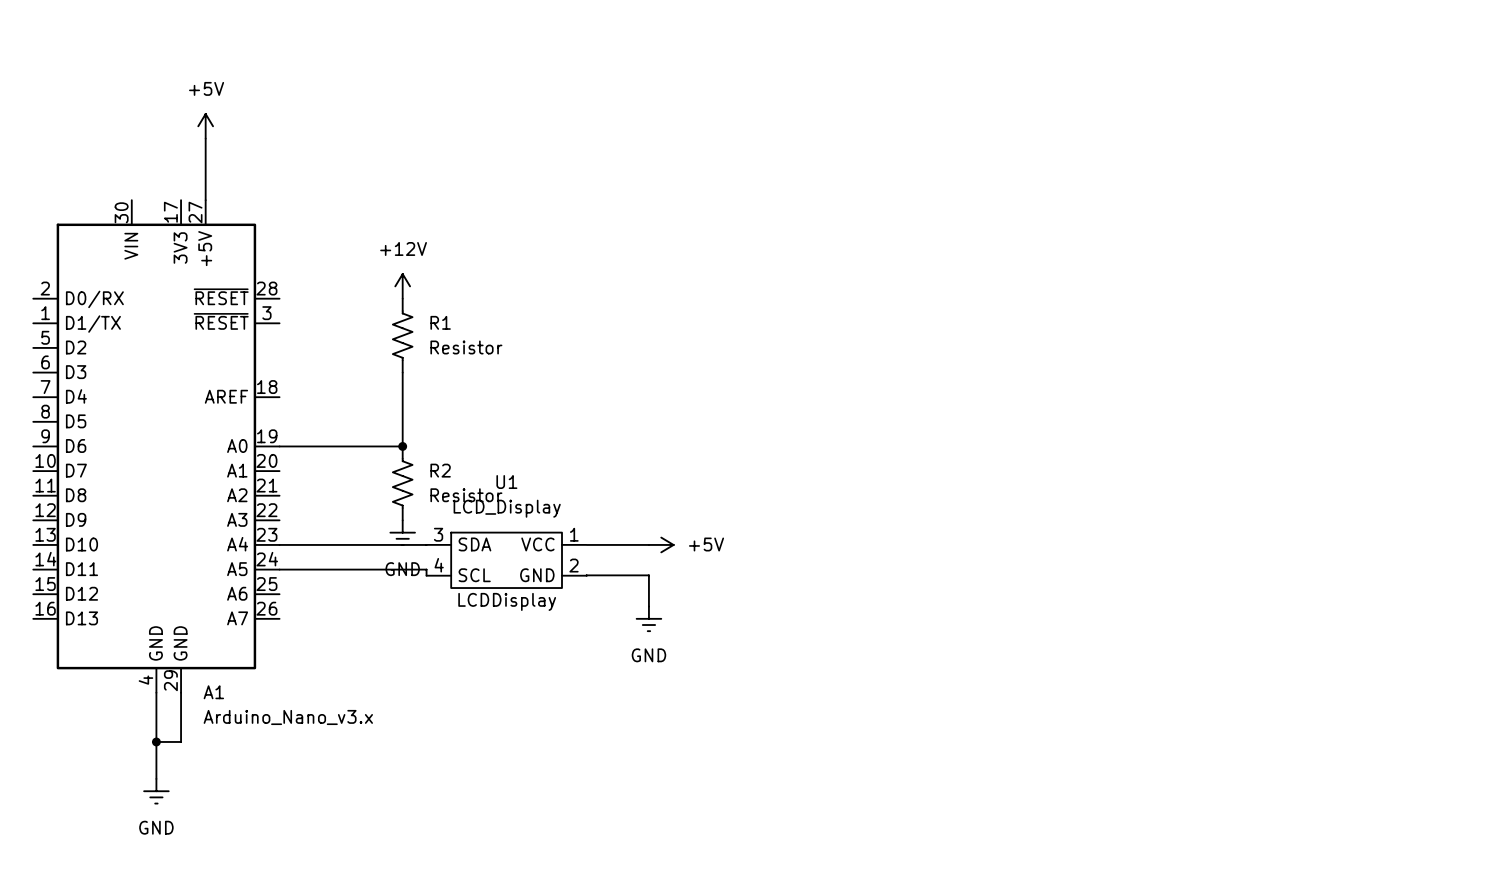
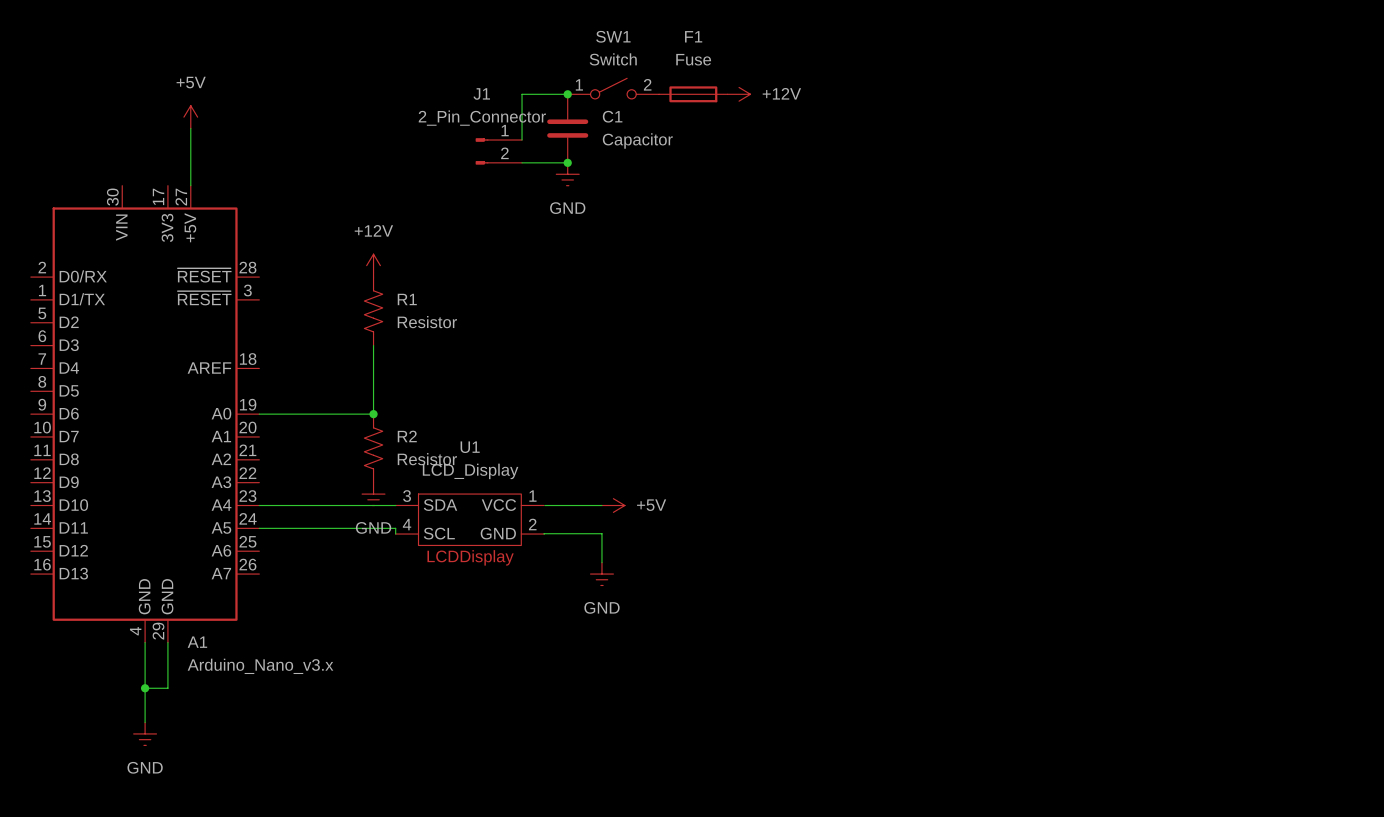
SW1: none -> Switch (613, 88)
wire: none -> (567, 94) (522, 94) (522, 140)
junction: none -> (567, 94)
F1: none -> Fuse (693, 94)
power symbol: none -> +12V (739, 94)
C1: none -> Capacitor (567, 128)
J1: none -> 2_Pin_Connector (498, 151)
wire: none -> (522, 162) (567, 162)
junction: none -> (567, 162)
power symbol: none -> GND (567, 174)

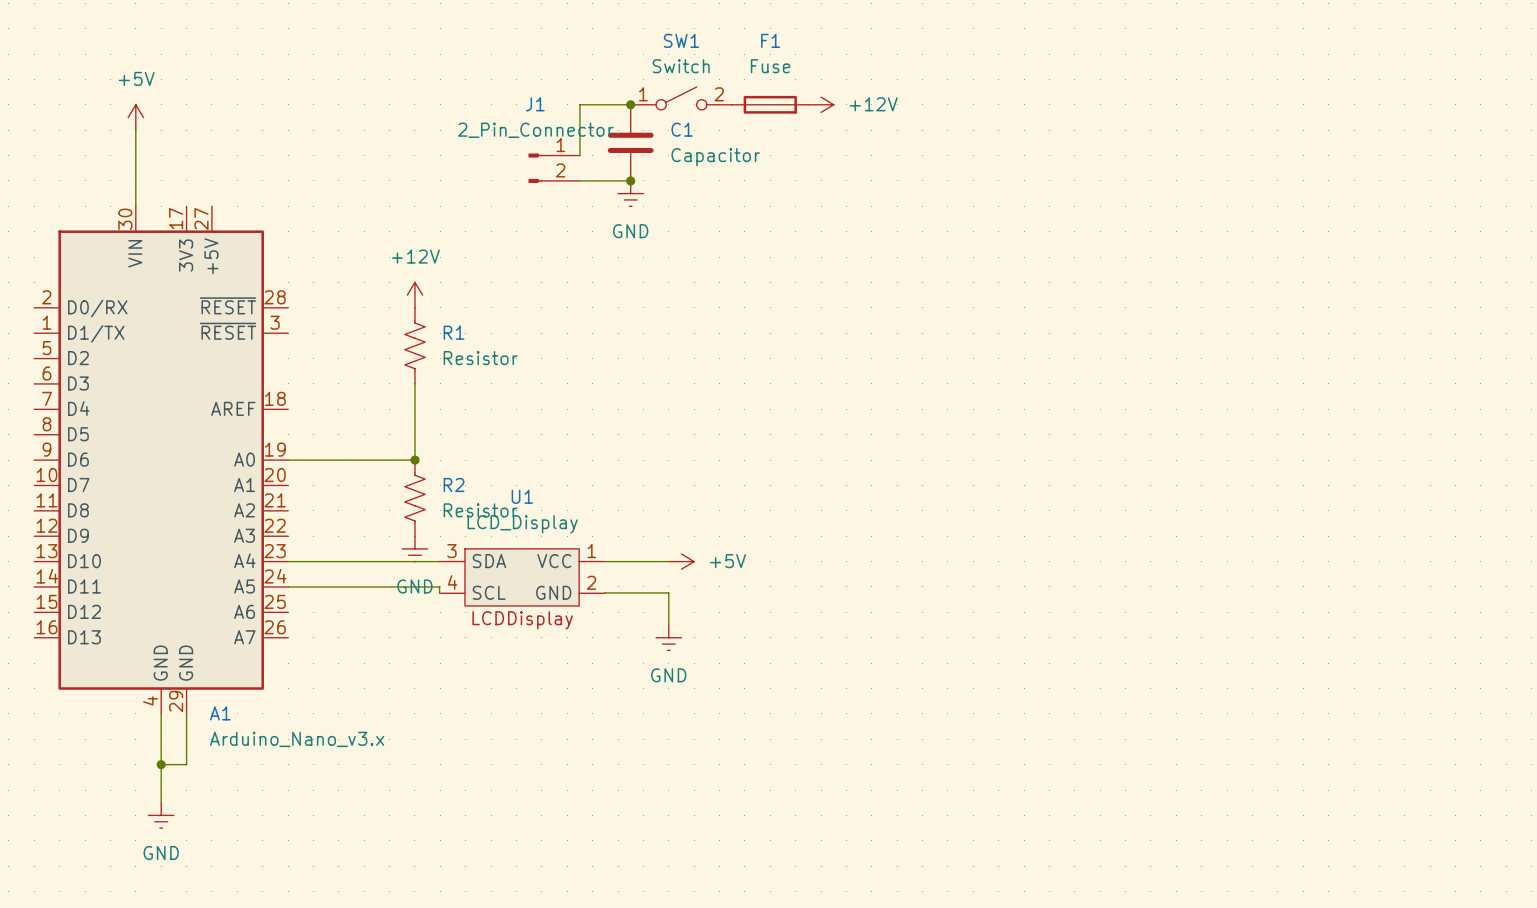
wire: none -> (135, 130) (135, 206)
power symbol position: +5V (190, 117) -> +5V (135, 117)
wire: (190, 128) (190, 185) -> none

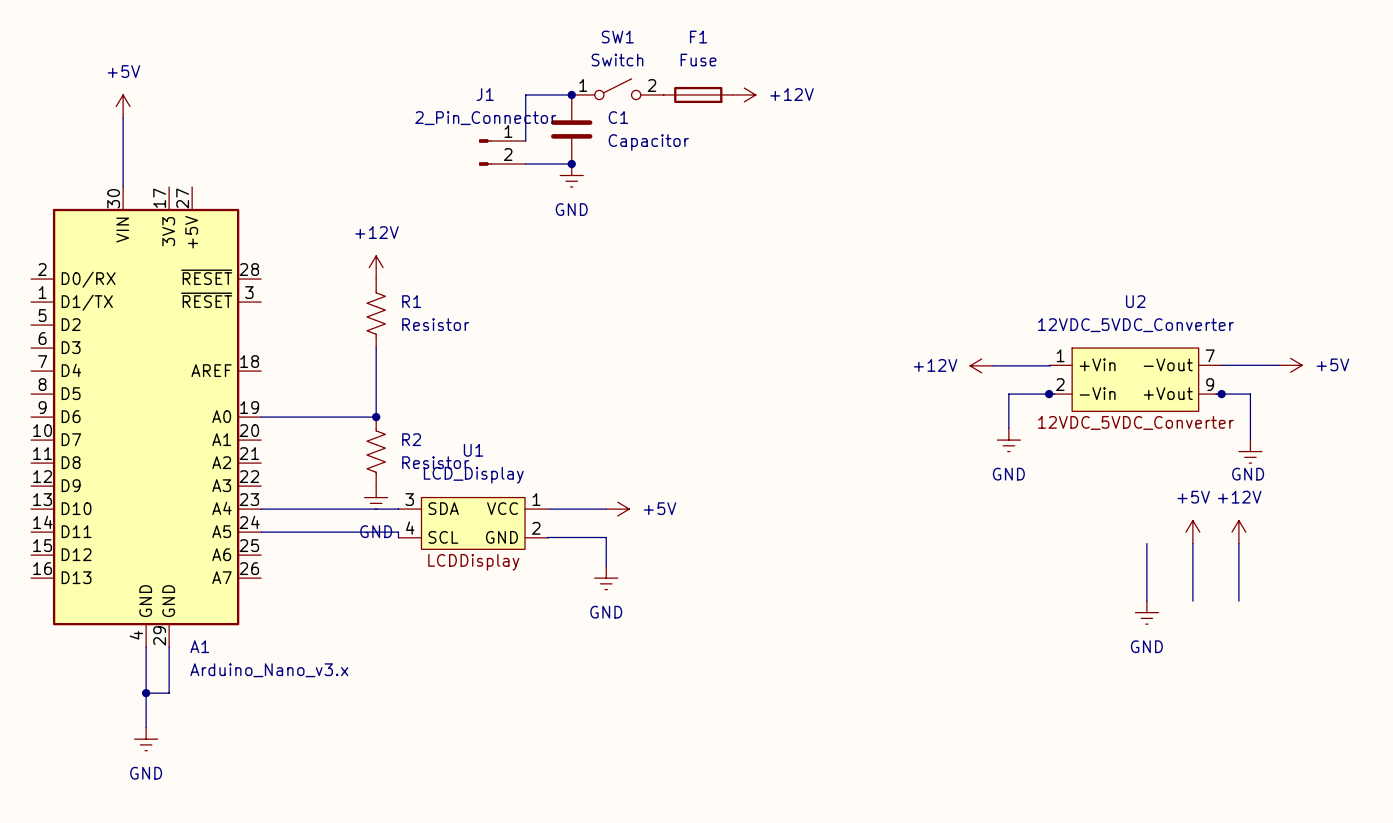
wire: none -> (1221, 365) (1279, 365)
power symbol: none -> +5V (1290, 365)
power symbol: none -> +12V (981, 365)
wire: none -> (993, 365) (1050, 365)
U2: none -> 12VDC_5VDC_Converter (1135, 379)
junction: none -> (1049, 394)
wire: none -> (1054, 394) (1008, 394) (1008, 428)
wire: none -> (1215, 394) (1250, 394) (1250, 440)
junction: none -> (1221, 394)
power symbol: none -> GND (1008, 440)
power symbol: none -> GND (1250, 451)
power symbol: none -> +5V (1192, 532)
power symbol: none -> +12V (1238, 532)
wire: none -> (1146, 543) (1146, 601)
wire: none -> (1192, 543) (1192, 601)
wire: none -> (1238, 543) (1238, 601)
power symbol: none -> GND (1146, 612)

